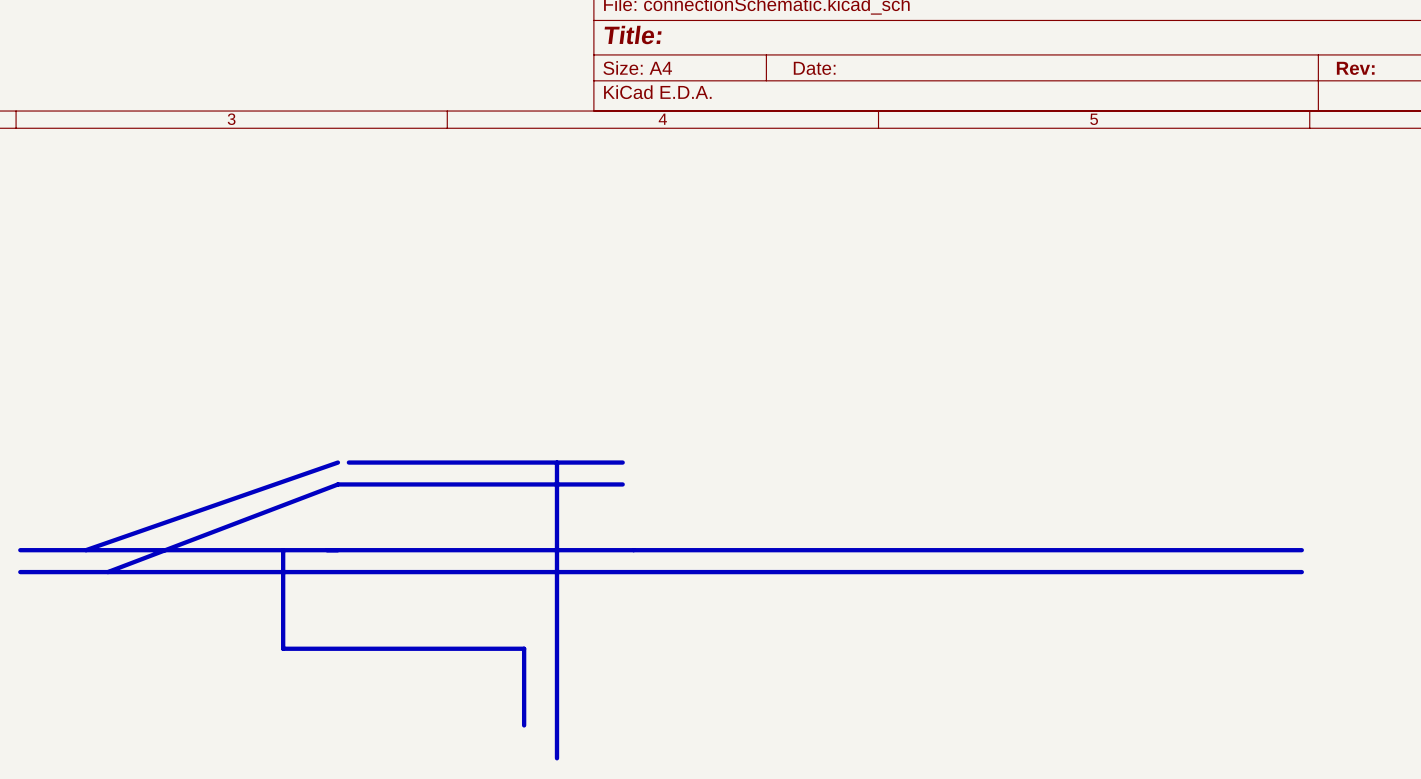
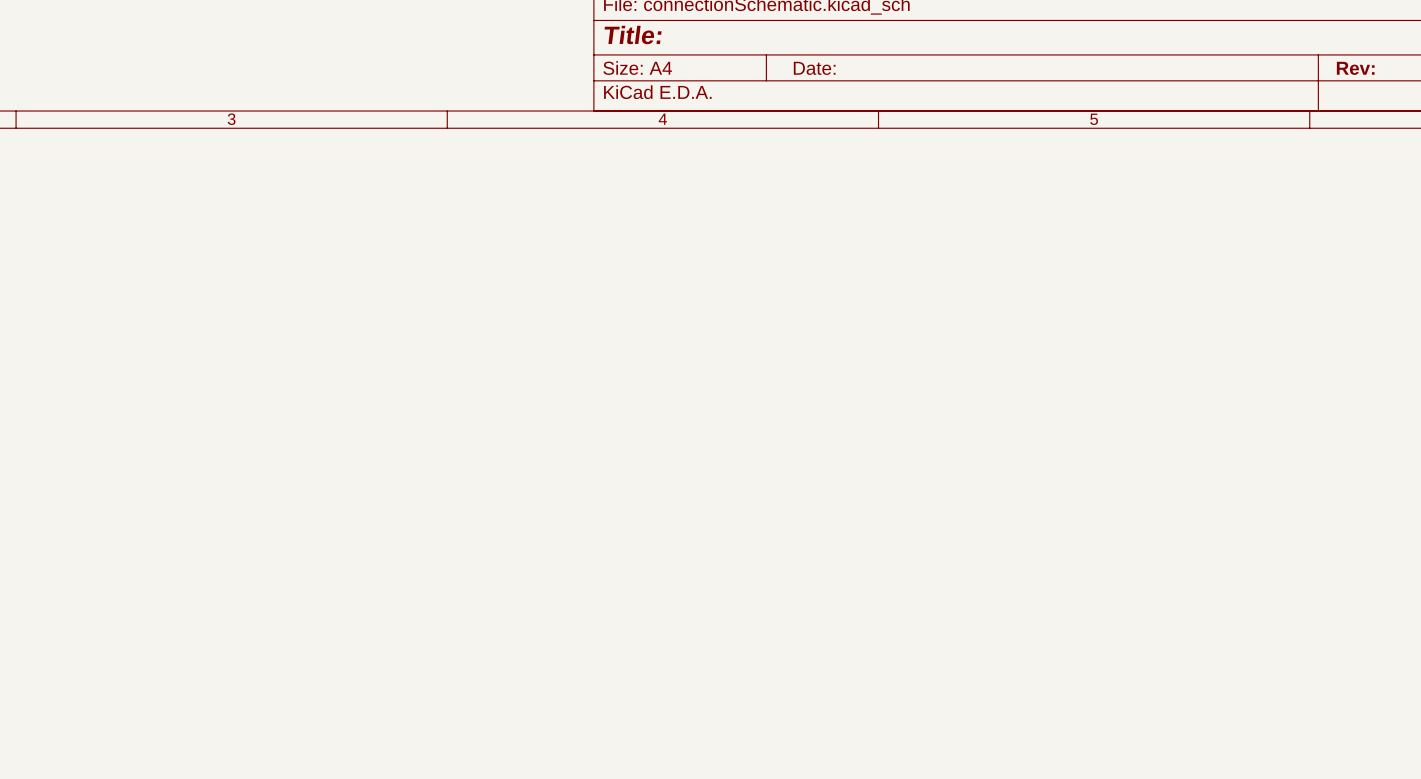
line: (337, 462) (86, 550) -> none
line: (348, 462) (622, 462) -> none
line: (556, 462) (556, 758) -> none
line: (622, 484) (337, 484) (107, 572) -> none
line: (20, 550) (1301, 550) -> none
line: (283, 550) (283, 648) (524, 648) (524, 725) -> none
line: (20, 572) (1301, 572) -> none

